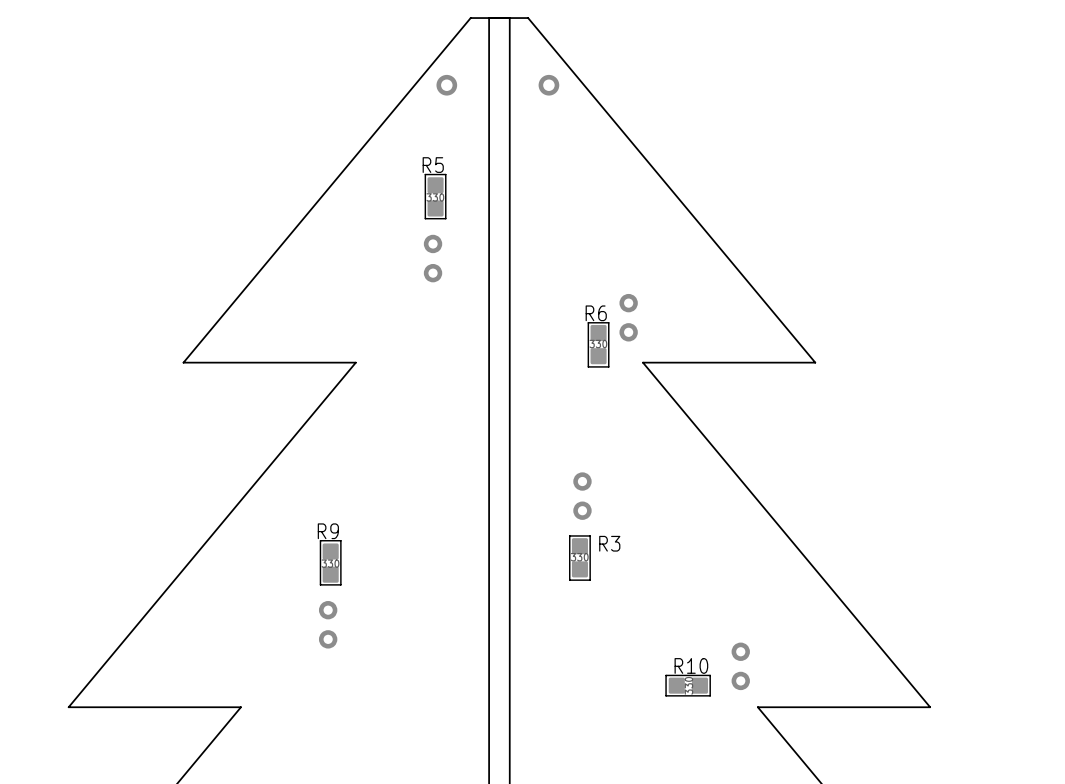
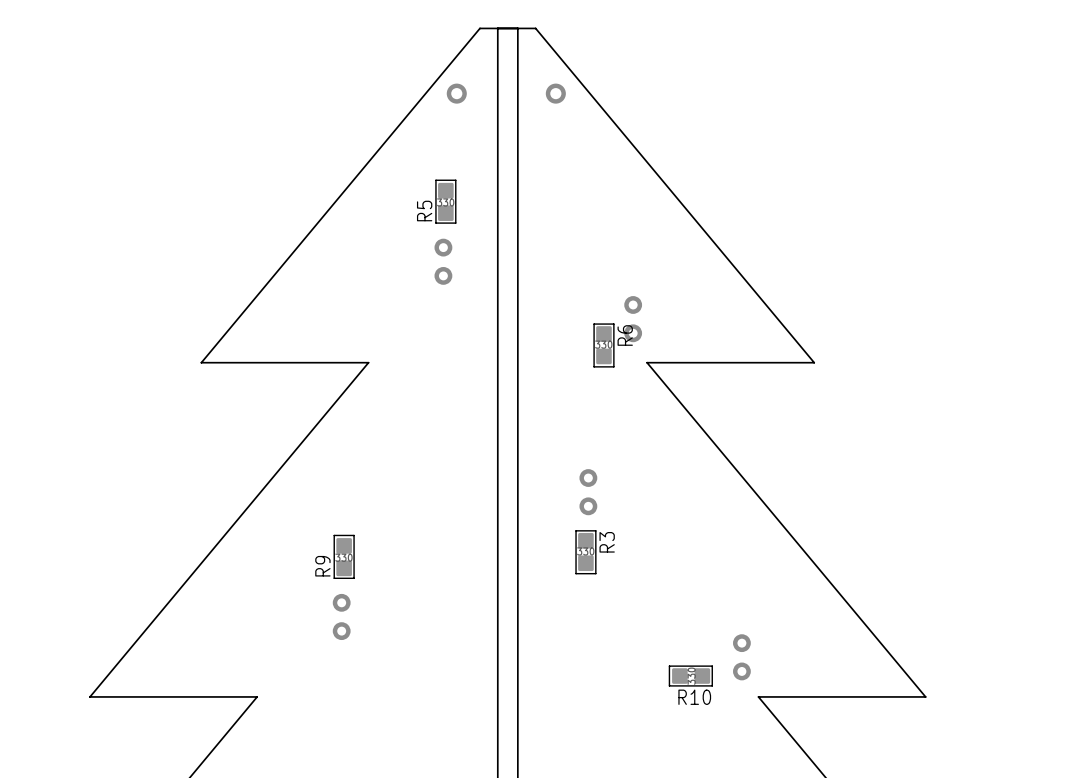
R5 name rotation: 0° (433, 165) -> 90° counterclockwise (424, 211)
R5 name position: R5 (433, 165) -> R5 (424, 211)
R6 name rotation: 0° (596, 313) -> 90° counterclockwise (625, 335)
R6 name position: R6 (596, 313) -> R6 (625, 335)
R9 name rotation: 0° (328, 531) -> 90° counterclockwise (322, 566)
R9 name position: R9 (328, 531) -> R9 (322, 566)
R3 name rotation: 0° (609, 543) -> 90° counterclockwise (607, 542)
R10 name position: R10 (691, 665) -> R10 (694, 697)

